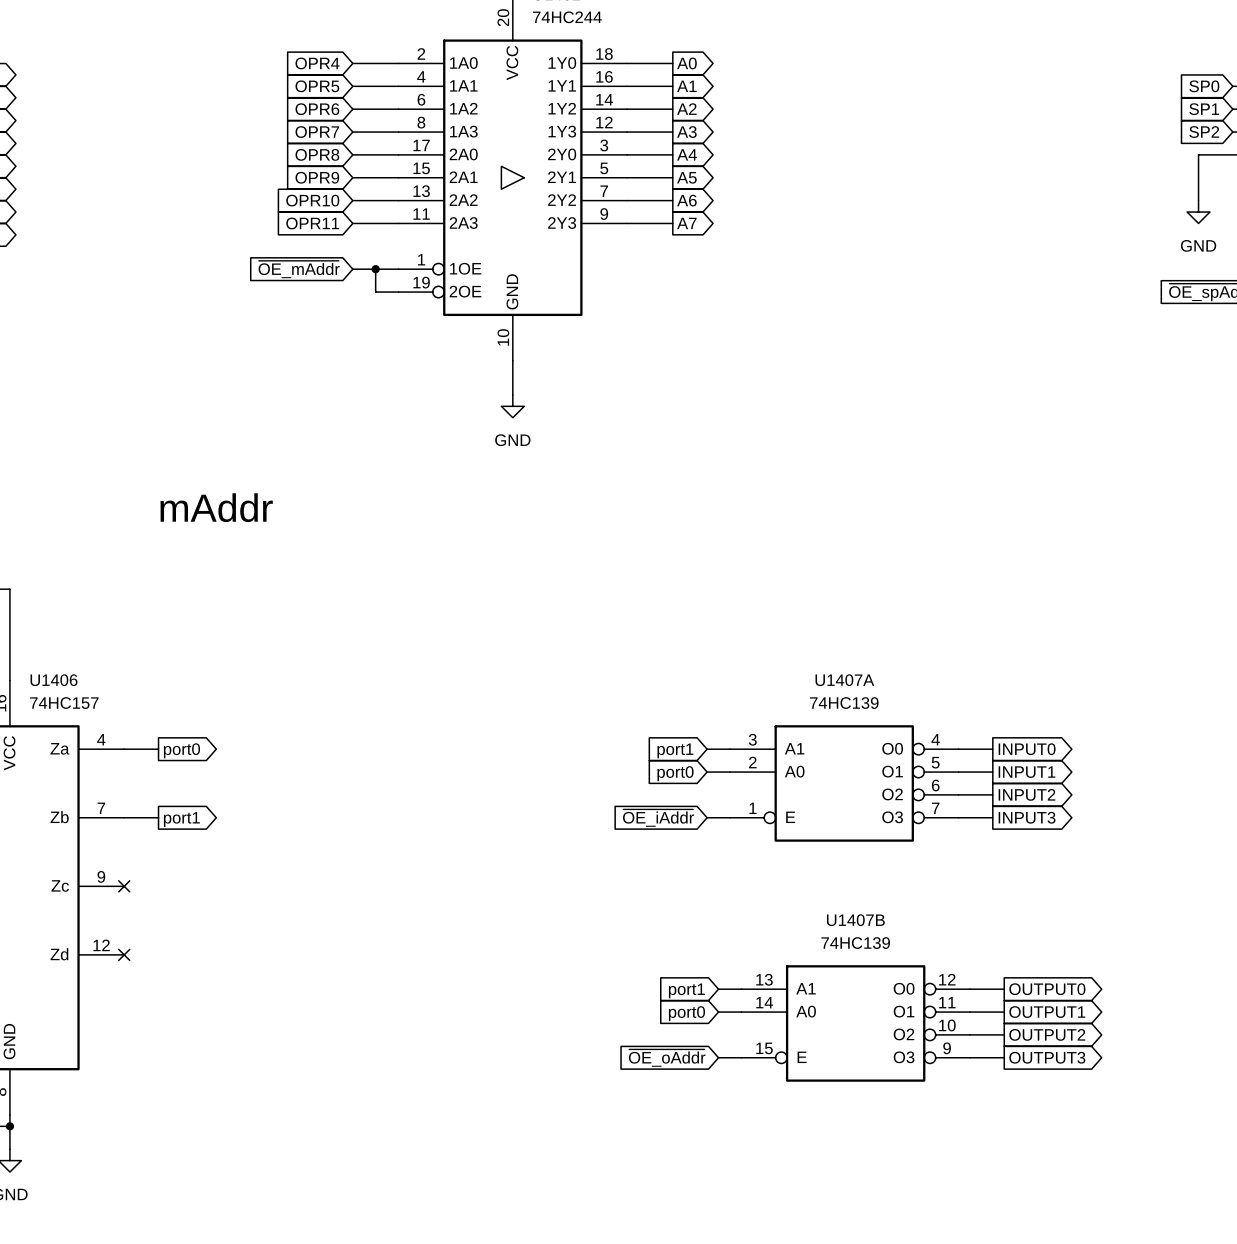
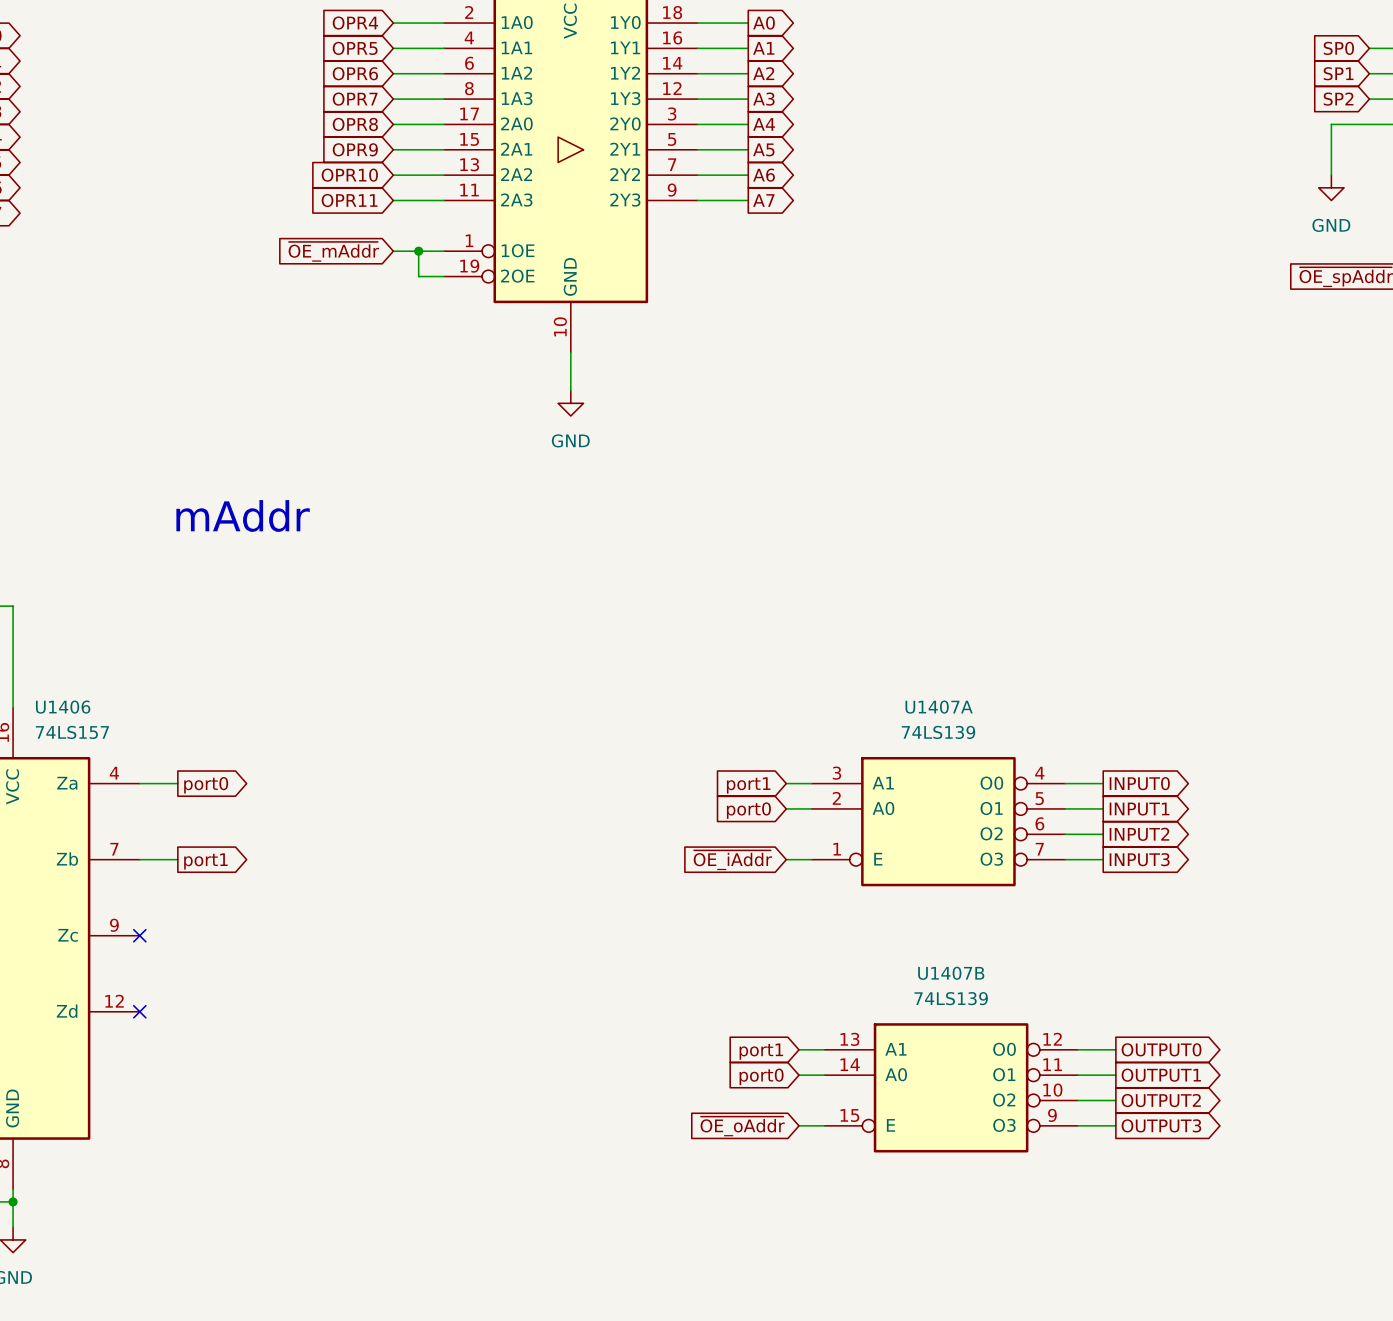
U1406 value: 74HC157 (64, 703) -> 74LS157 (72, 732)
U1407A value: 74HC139 (844, 703) -> 74LS139 (938, 732)
U1407B value: 74HC139 (855, 943) -> 74LS139 (951, 998)

